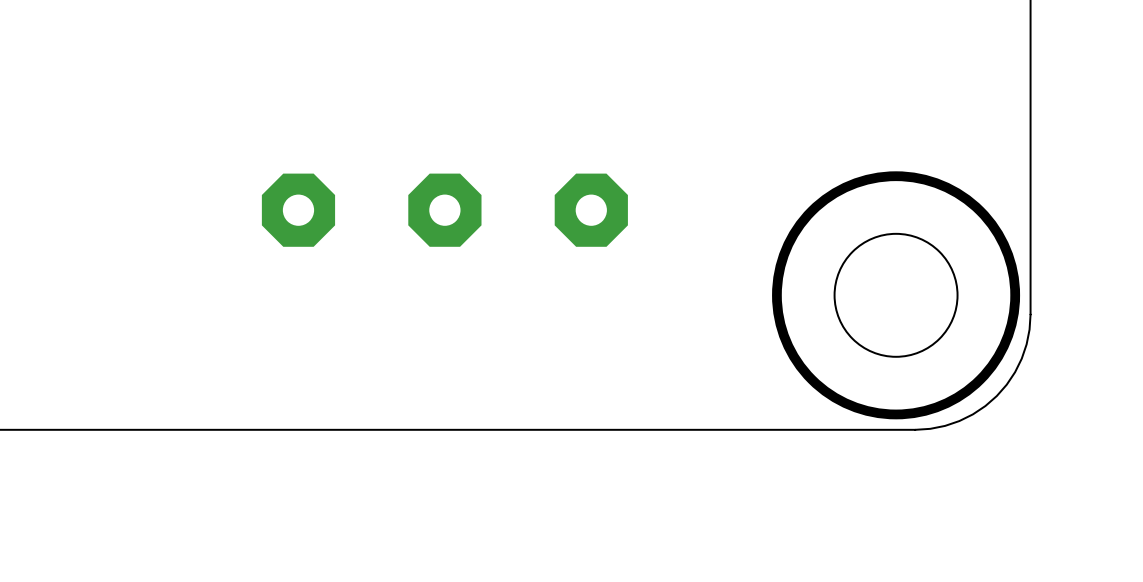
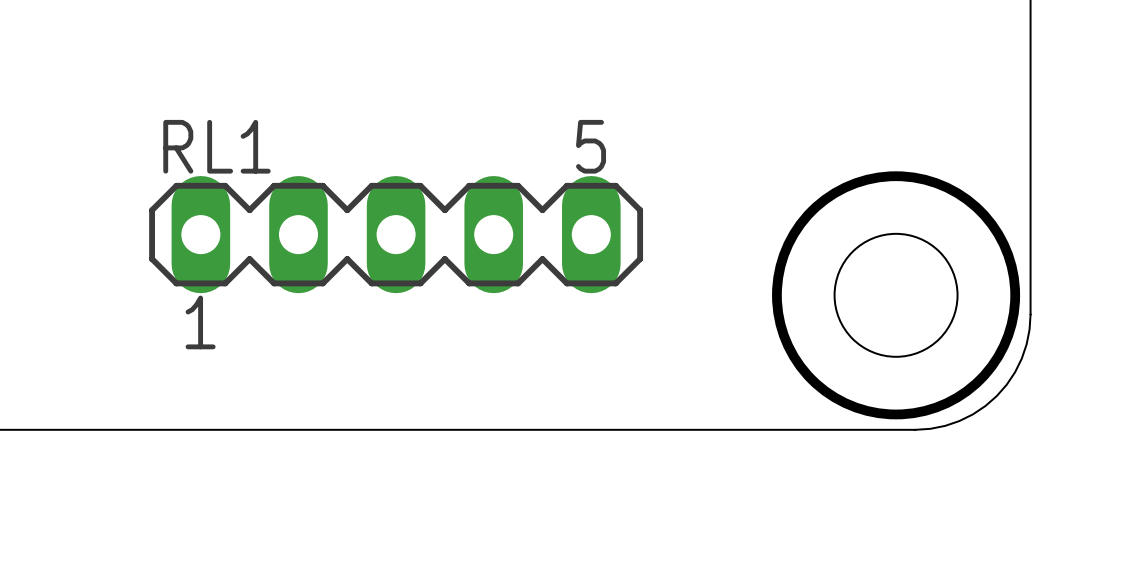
part: (444, 210) -> none
RL1: none -> (396, 234)

